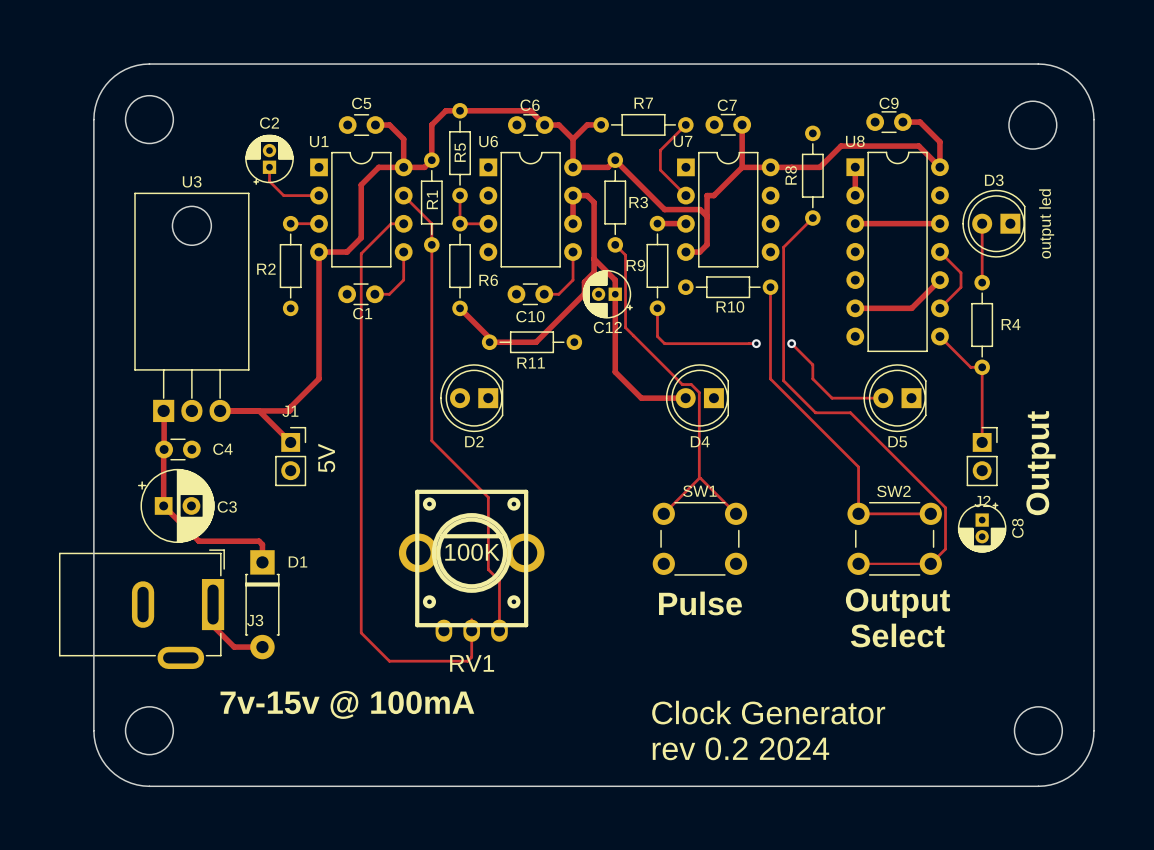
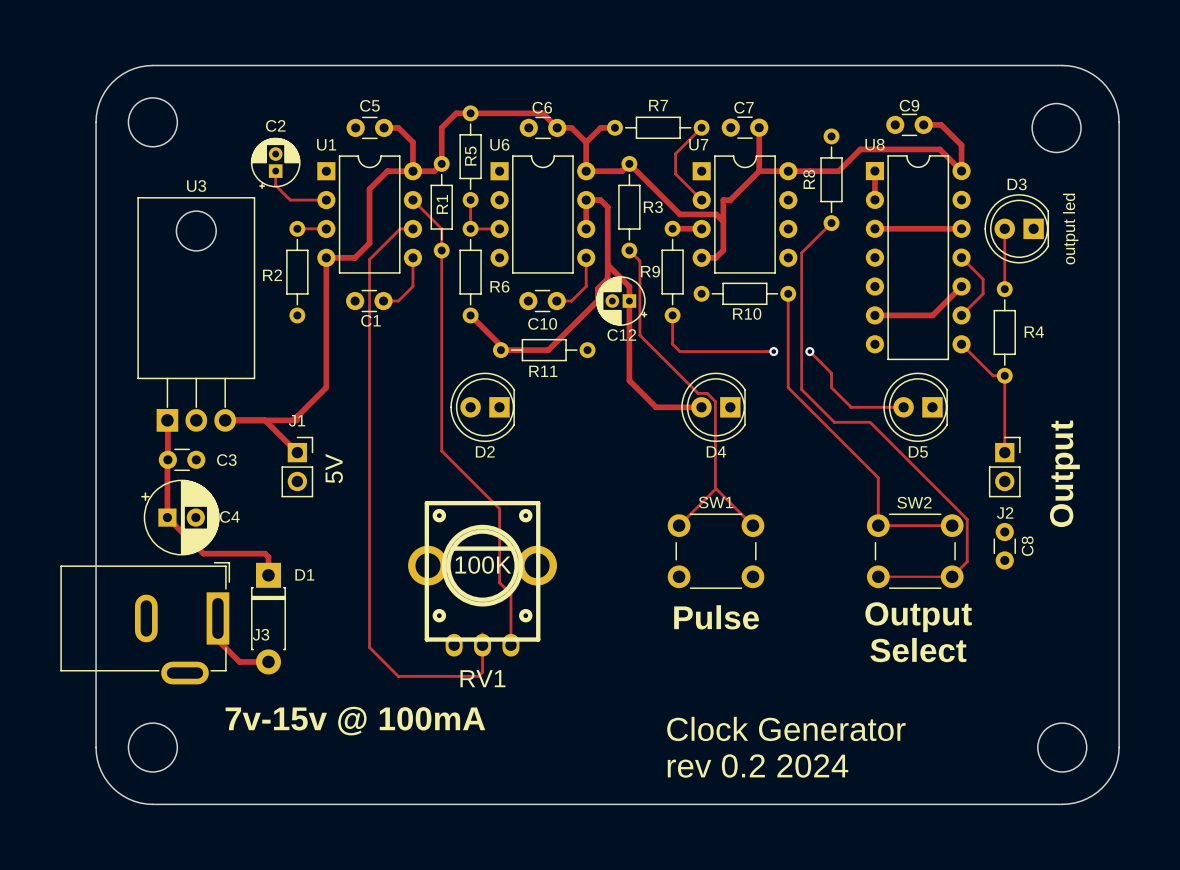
C4 name position: C4 (222, 449) -> C4 (229, 516)
C8 footprint: [957, 502, 1007, 553] -> [993, 522, 1016, 570]
C3 name position: C3 (227, 506) -> C3 (226, 460)

